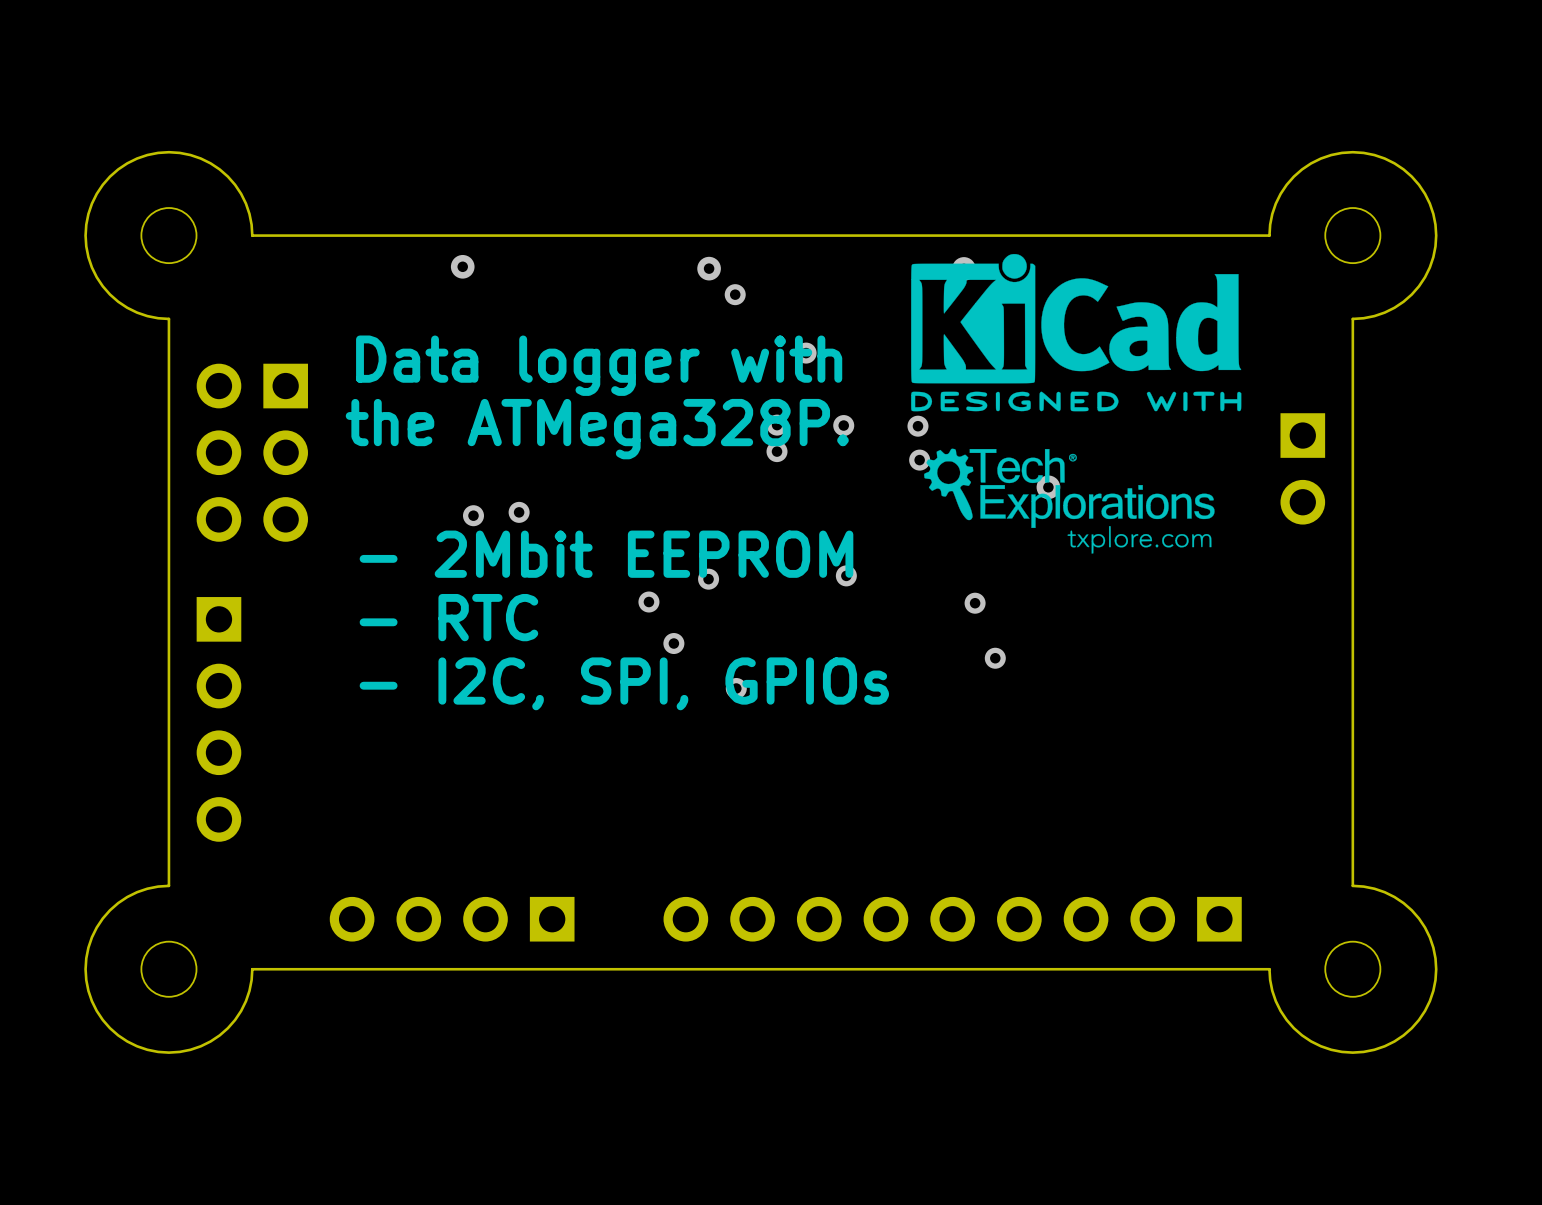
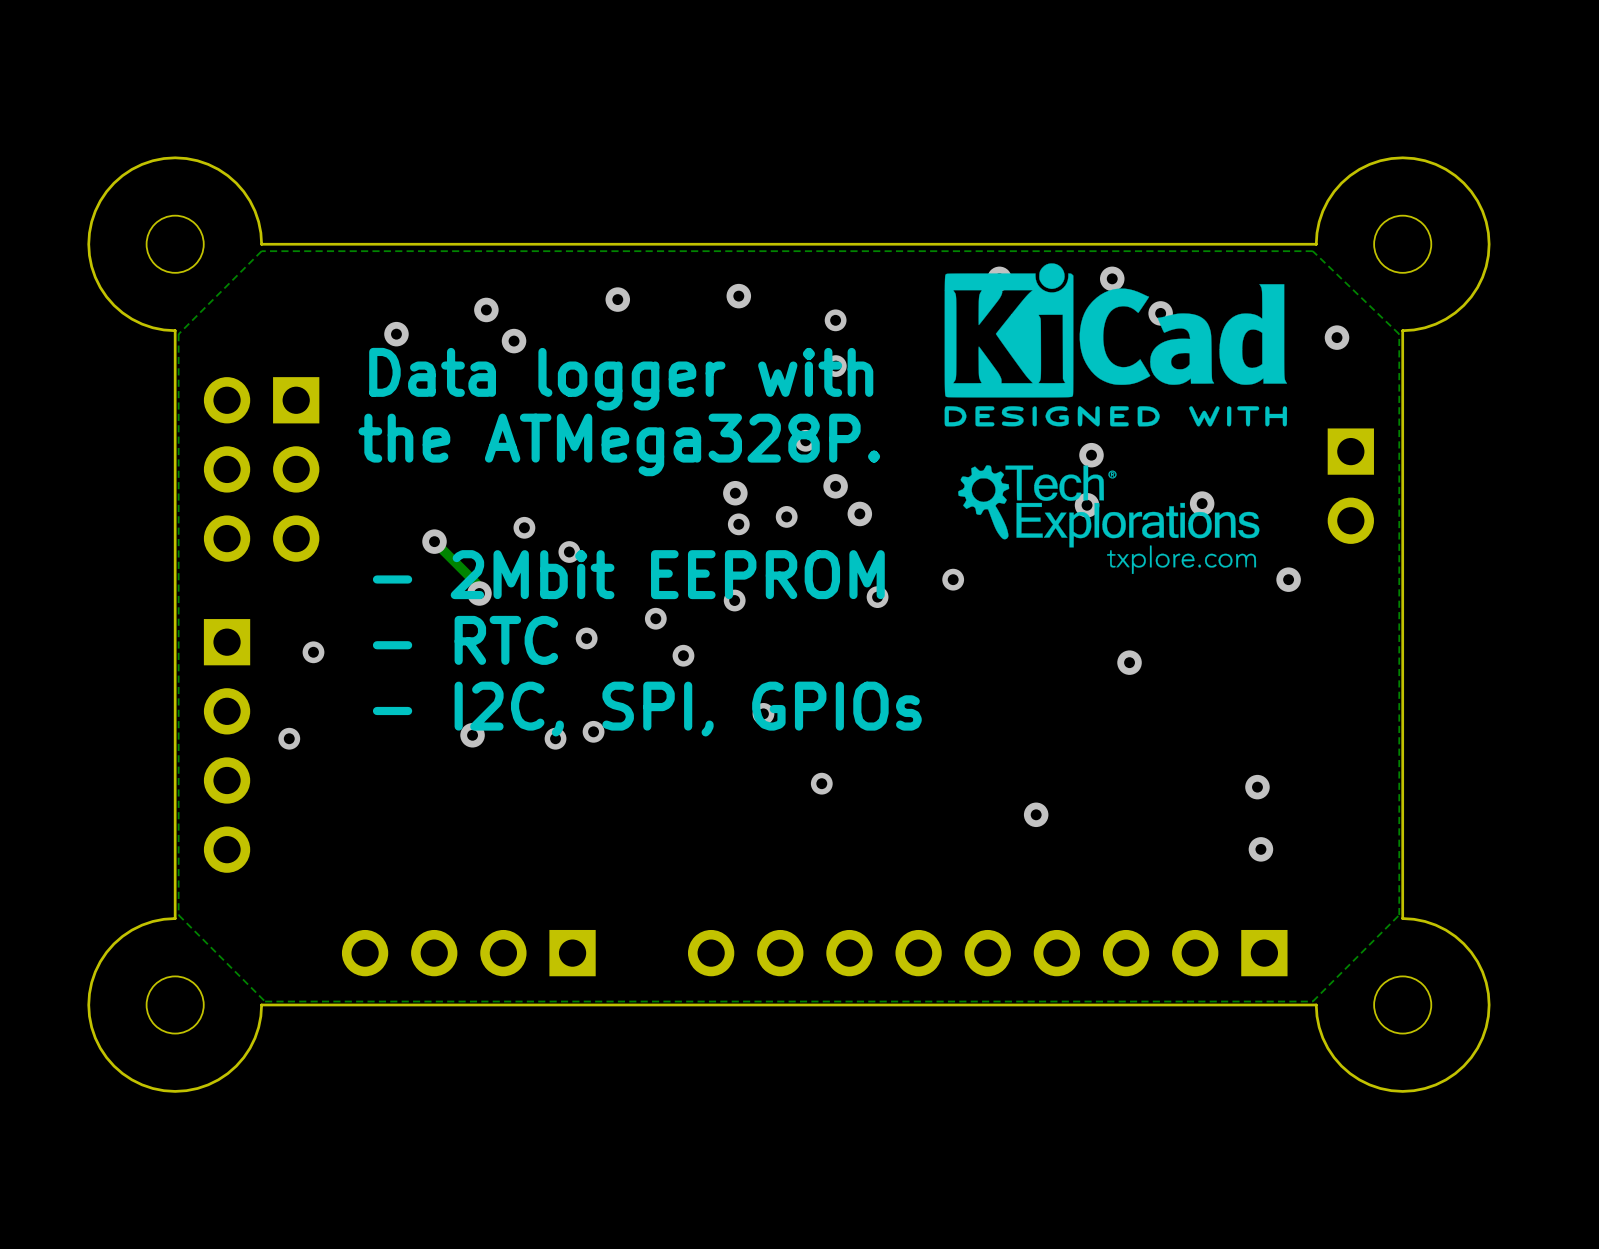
zone outline: none -> (1312, 251) (1399, 334) (1399, 915) (1312, 1001) (265, 1001) (178, 915) (178, 334) (261, 251) (1312, 251)
via position: (462, 266) -> (486, 309)
via position: (709, 268) -> (738, 296)
via: none -> (1112, 278)
via: none -> (617, 299)
via: (735, 294) -> none
via: none -> (1160, 313)
via: none -> (835, 320)
via: none -> (396, 334)
via: none -> (1337, 337)
via: none -> (514, 341)
via: (843, 425) -> none
via: (917, 426) -> none
via: none -> (1091, 455)
via: (777, 451) -> none
via: (919, 460) -> none
via: none -> (835, 486)
via: none -> (735, 493)
via: none -> (1202, 503)
via: none -> (859, 513)
via: none -> (786, 516)
via: none -> (738, 524)
via position: (519, 512) -> (524, 527)
via: (473, 515) -> none
track: none -> (434, 541) (479, 586) (479, 593)
via: none -> (434, 541)
via: none -> (569, 552)
via: none -> (953, 579)
via: none -> (1288, 579)
via: none -> (479, 593)
via position: (648, 602) -> (655, 618)
via: (975, 603) -> none
via: none -> (586, 638)
via: none -> (313, 652)
via: none -> (1129, 662)
via position: (673, 643) -> (683, 655)
via: (995, 658) -> none
via: none -> (593, 731)
via: none -> (472, 735)
via: none -> (289, 738)
via: none -> (555, 738)
via: none -> (821, 783)
via: none -> (1257, 787)
via: none -> (1036, 814)
via: none -> (1260, 849)

